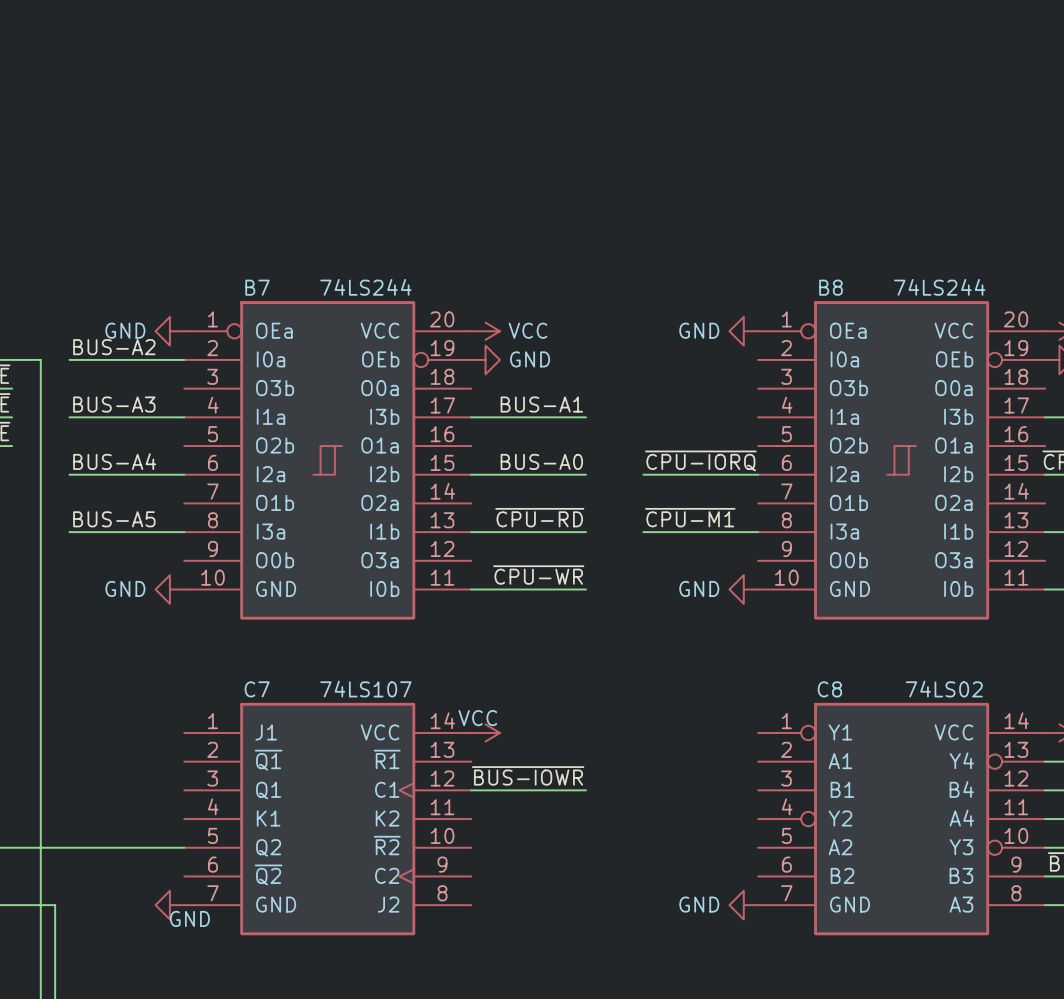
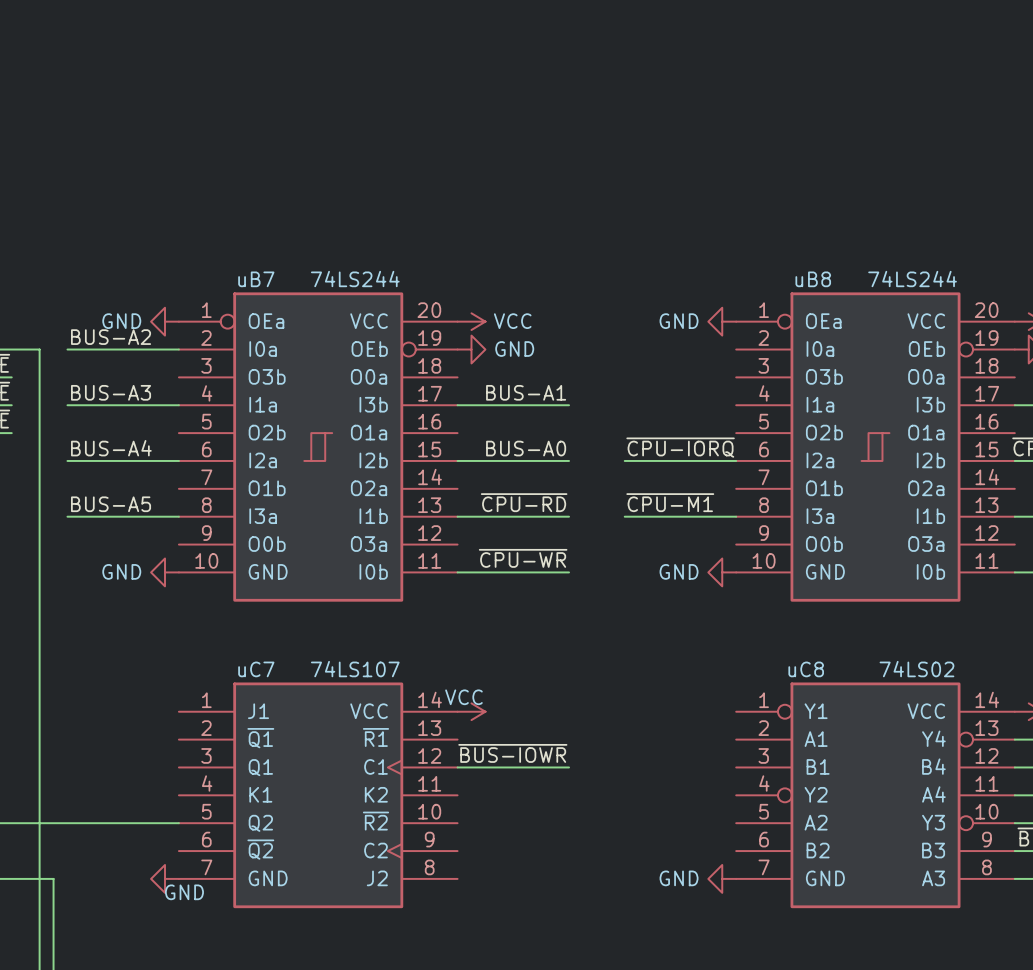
B7 name: B7 (257, 287) -> uB7 (256, 279)
B8 name: B8 (831, 287) -> uB8 (813, 279)
C7 name: C7 (257, 689) -> uC7 (256, 669)
C8 name: C8 (829, 689) -> uC8 (806, 669)

